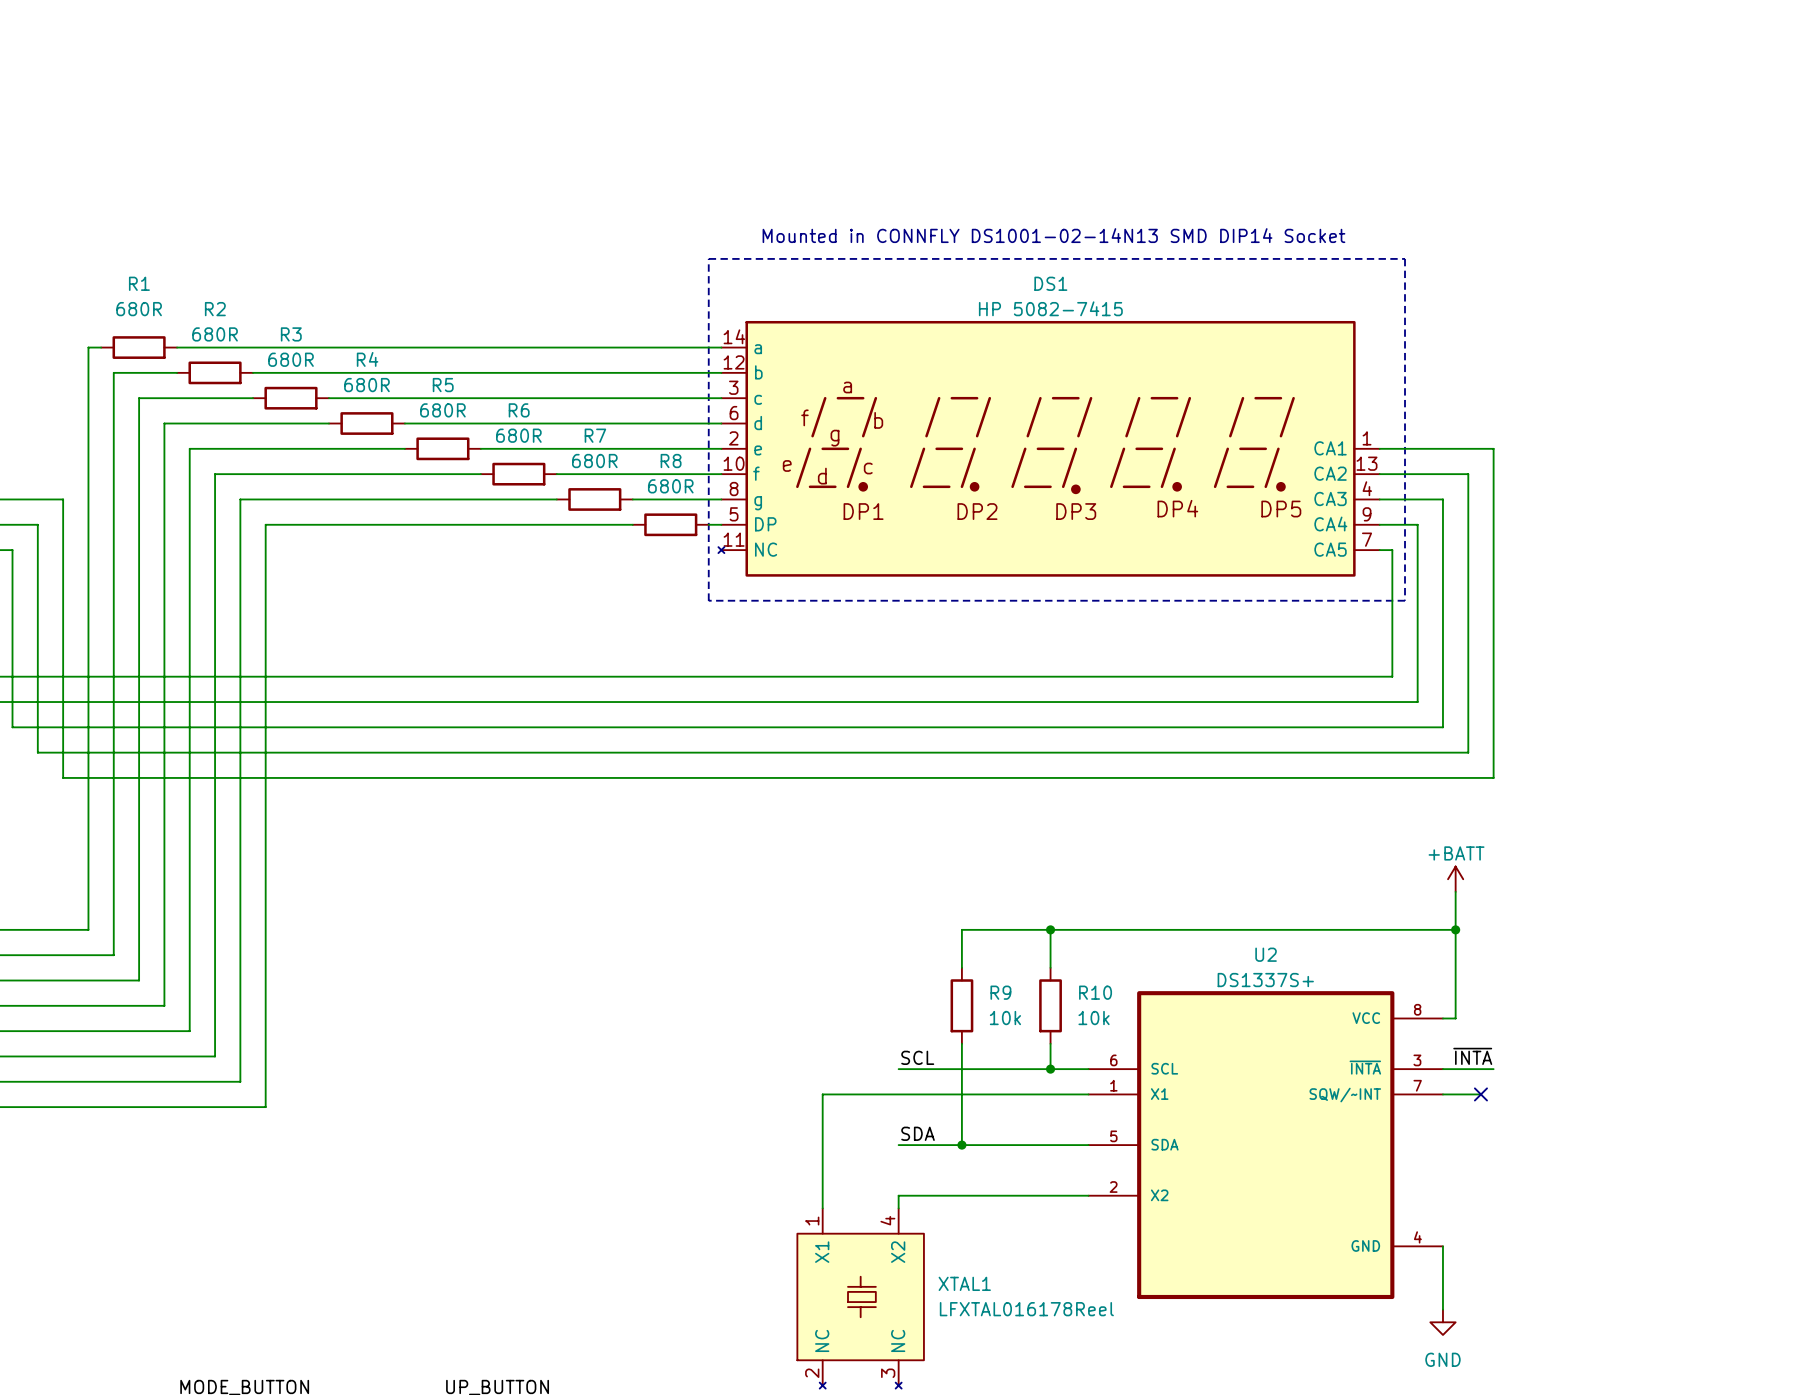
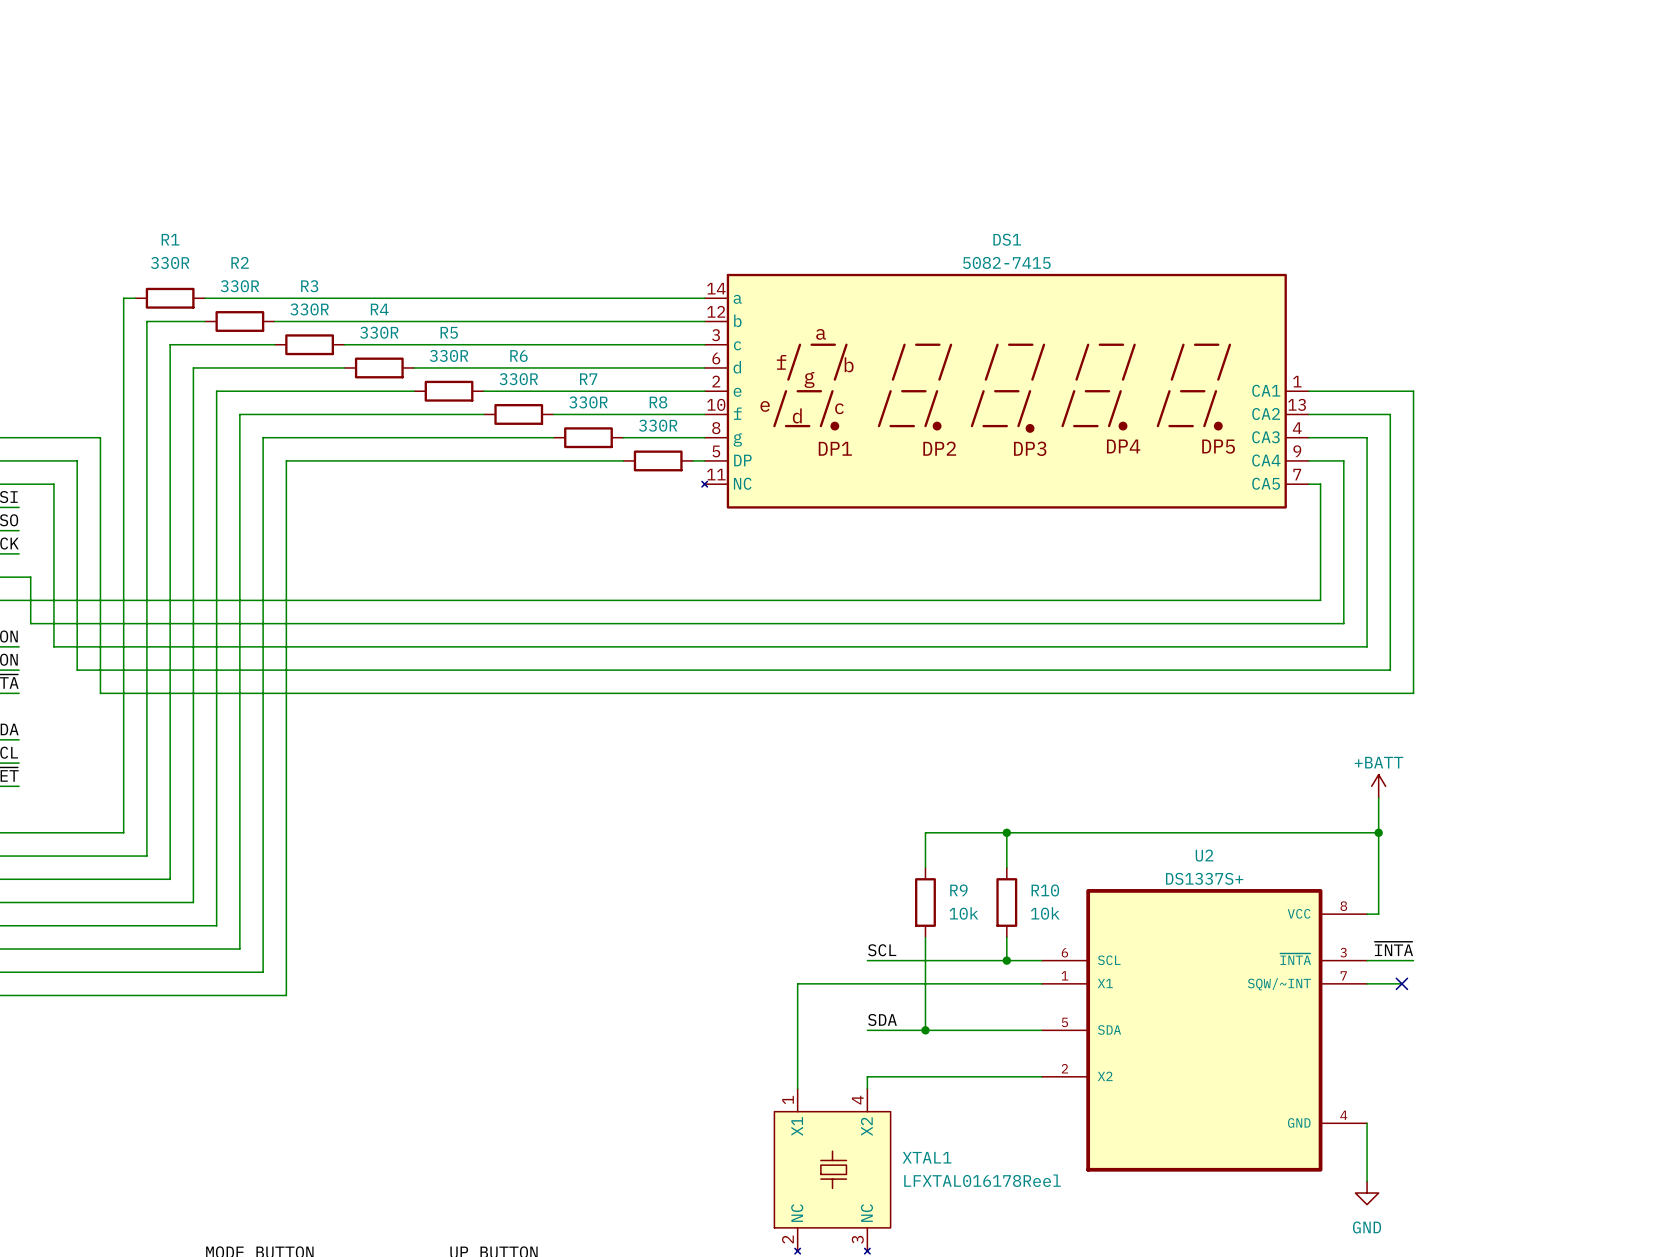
text: Mounted in CONNFLY DS1001-02-14N13 SMD DIP14 Socket (1053, 235) -> none
line: (708, 258) (1405, 258) (1405, 600) (708, 600) (708, 258) -> none
DS1 value: HP 5082-7415 (1050, 308) -> 5082-7415 (1006, 262)
R1 value: 680R (139, 309) -> 330R (170, 262)
R2 value: 680R (215, 334) -> 330R (239, 286)
R3 value: 680R (291, 359) -> 330R (309, 309)
R4 value: 680R (366, 385) -> 330R (379, 332)
R5 value: 680R (442, 410) -> 330R (449, 355)
R6 value: 680R (518, 435) -> 330R (518, 379)
R7 value: 680R (594, 461) -> 330R (588, 402)
R8 value: 680R (670, 486) -> 330R (658, 425)

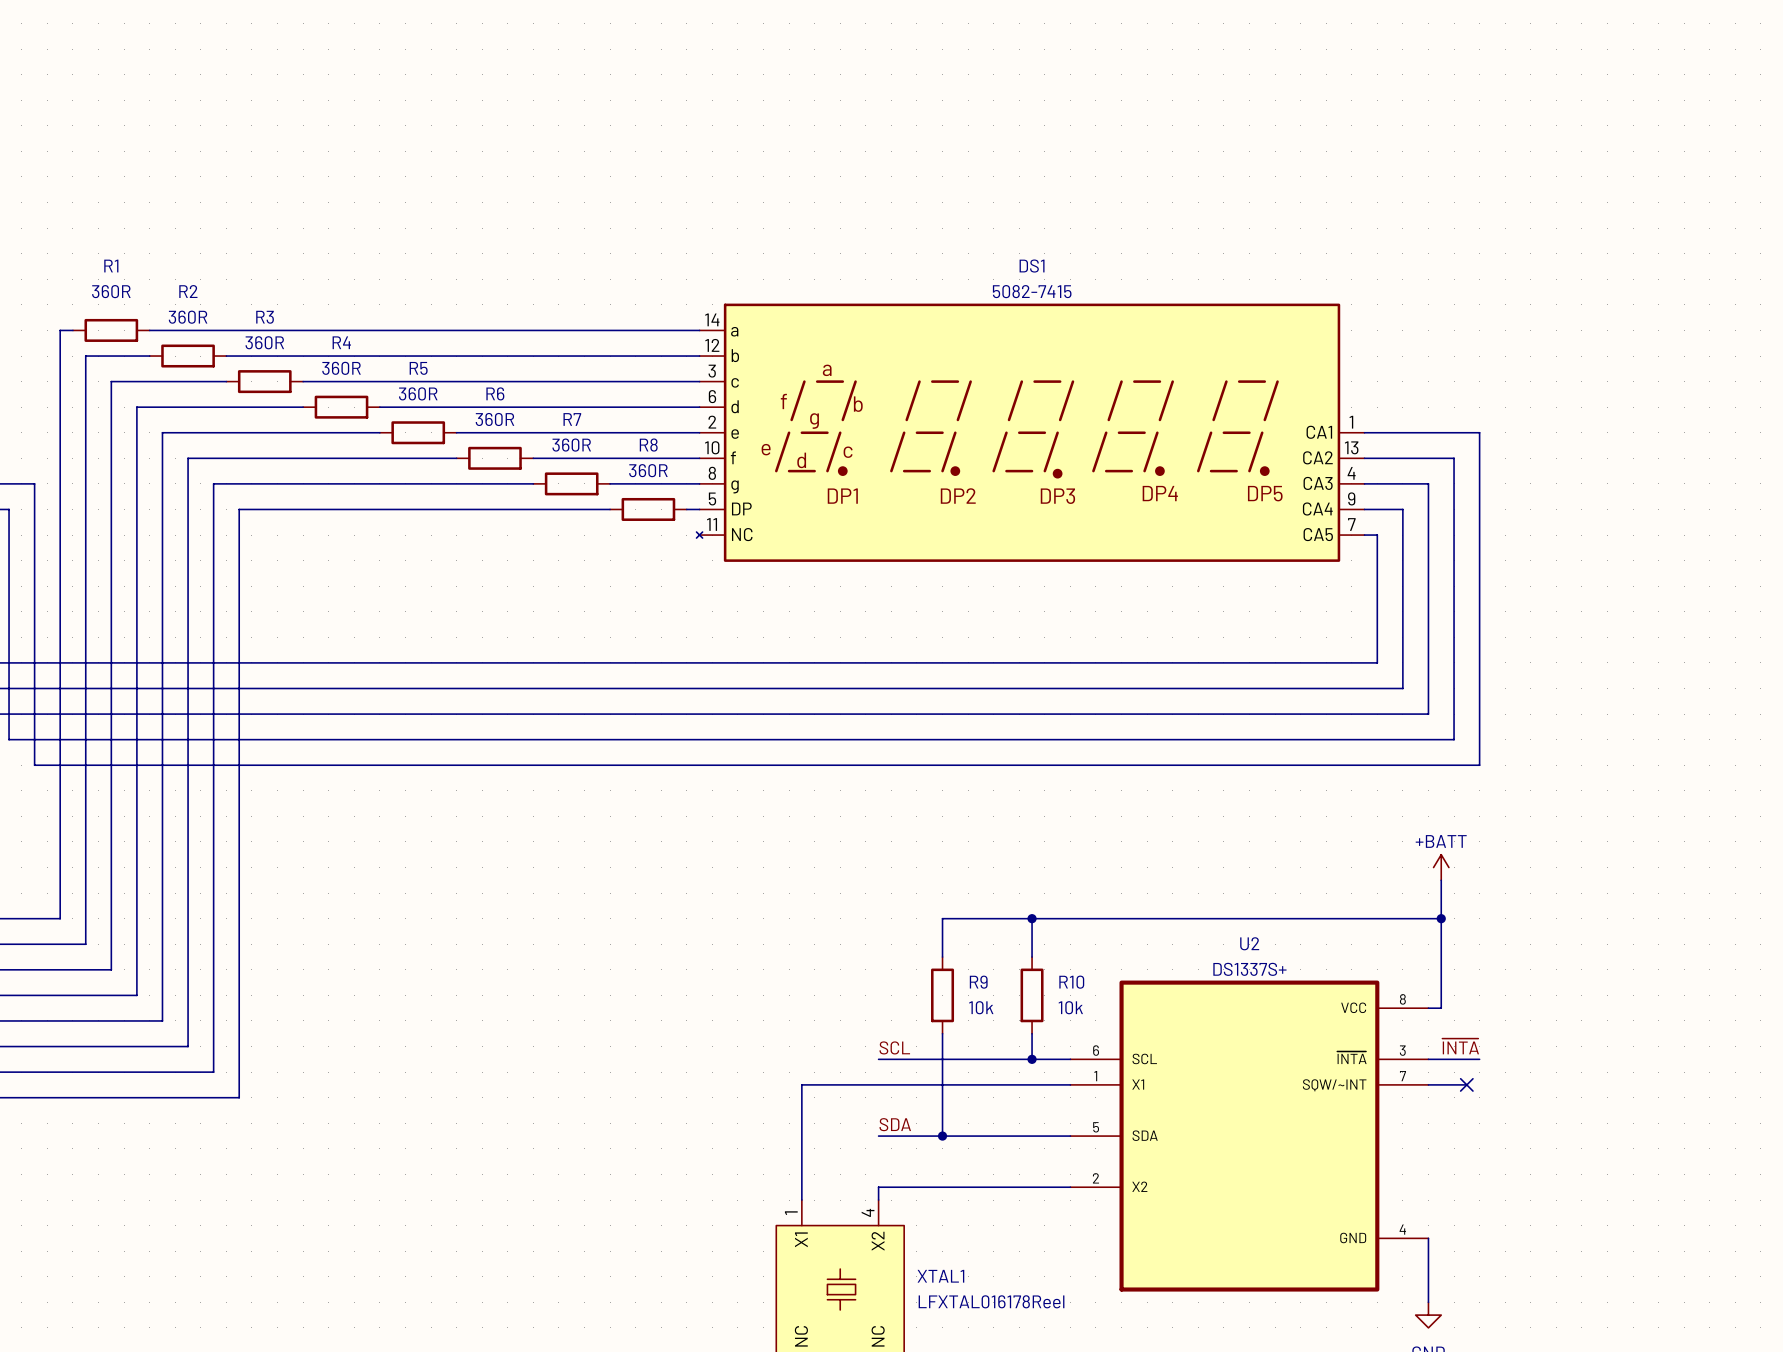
R1 value: 330R (170, 262) -> 360R (111, 291)
R2 value: 330R (239, 286) -> 360R (188, 317)
R3 value: 330R (309, 309) -> 360R (264, 342)
R4 value: 330R (379, 332) -> 360R (341, 368)
R5 value: 330R (449, 355) -> 360R (418, 393)
R6 value: 330R (518, 379) -> 360R (494, 419)
R7 value: 330R (588, 402) -> 360R (571, 445)
R8 value: 330R (658, 425) -> 360R (648, 470)

